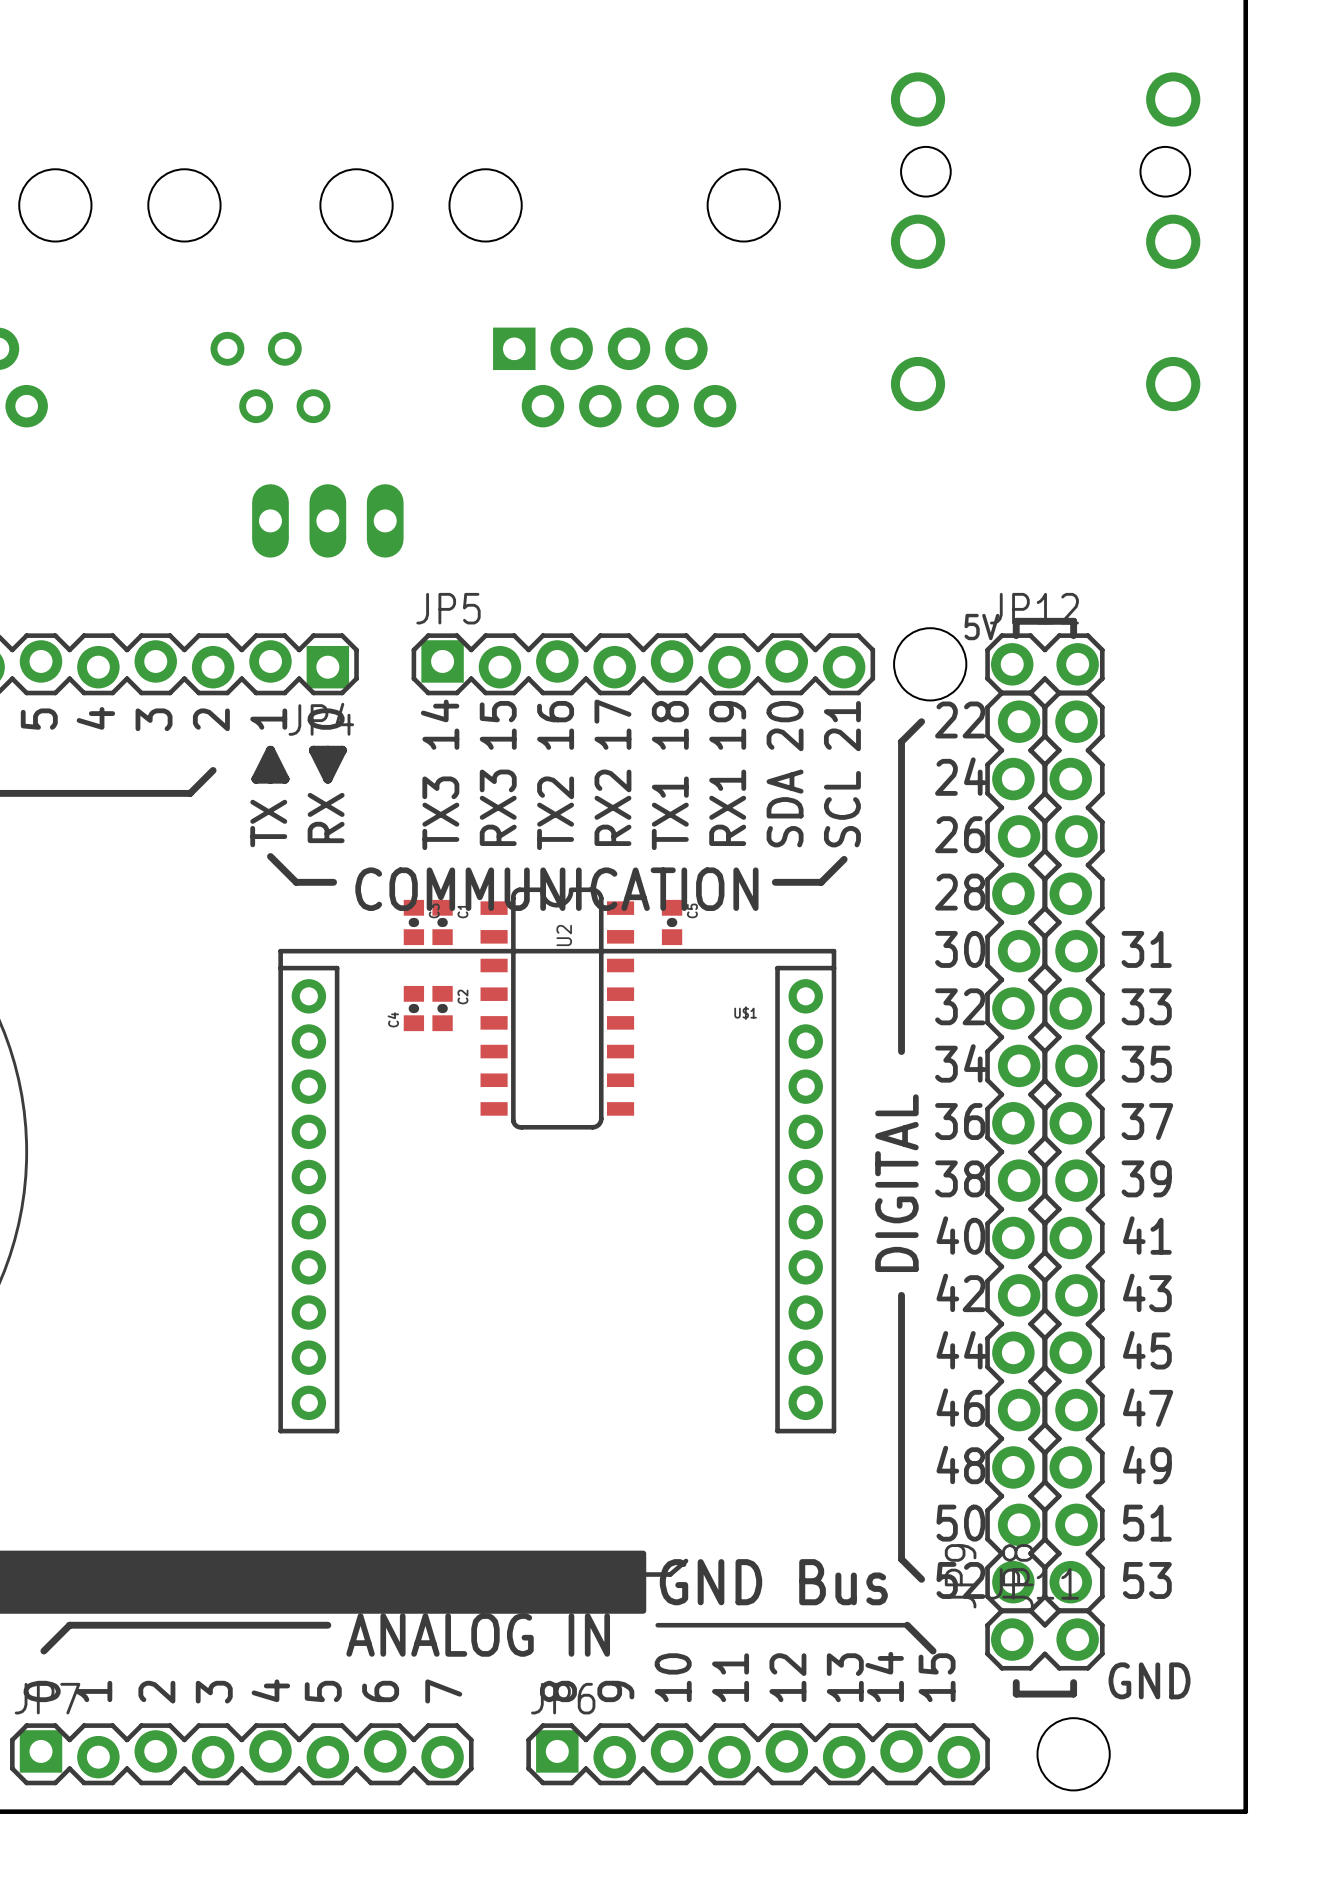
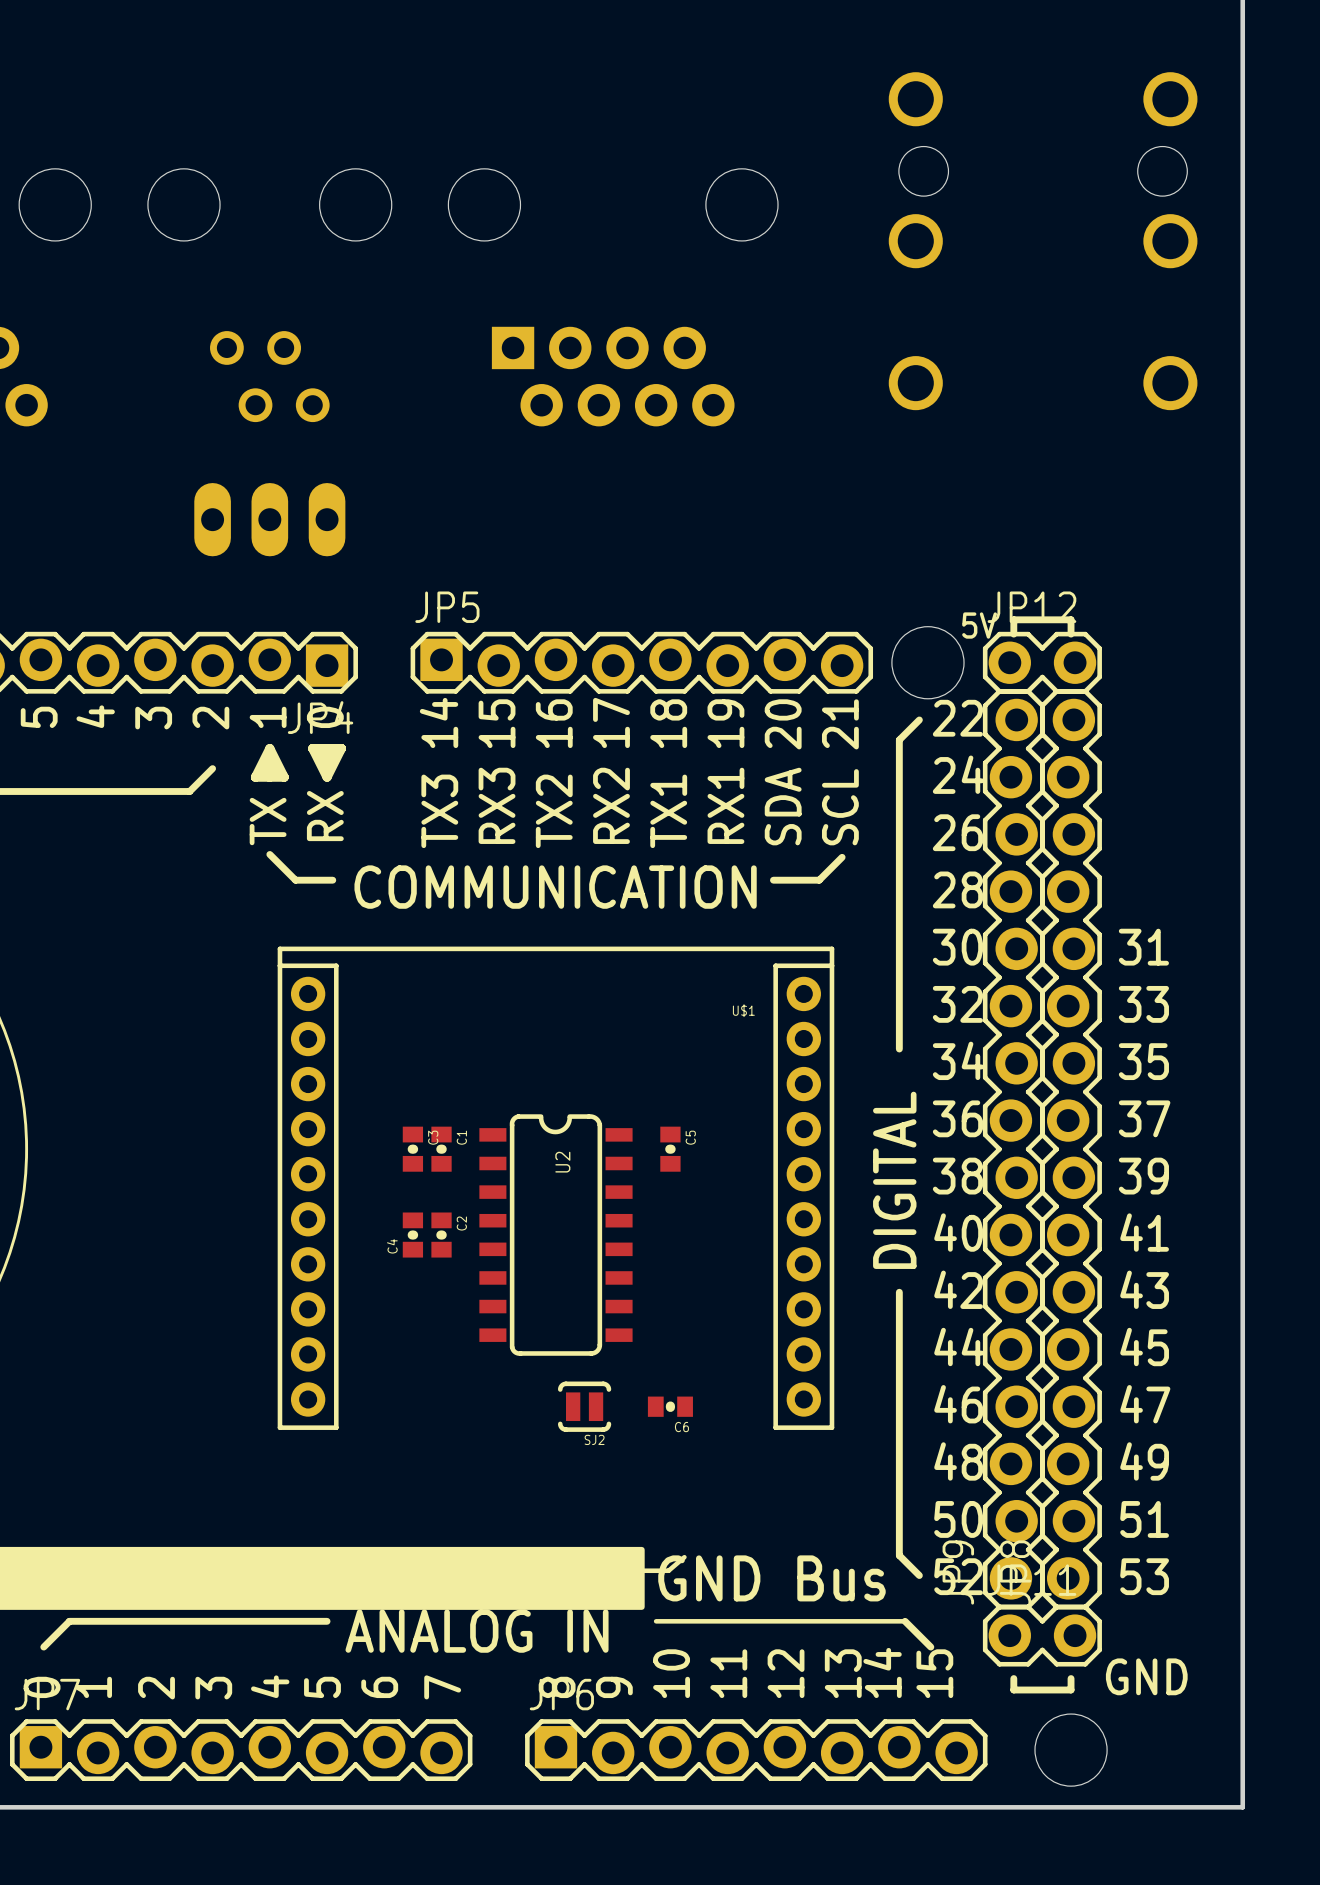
part position: (327, 520) -> (269, 519)
C3 position: (413, 922) -> (412, 1149)
C1 position: (442, 922) -> (441, 1149)
C5 position: (672, 922) -> (670, 1149)
C4 position: (413, 1008) -> (412, 1235)
C2 position: (442, 1008) -> (441, 1235)
U2 position: (557, 1008) -> (555, 1235)
SJ2: none -> (584, 1406)
C6: none -> (670, 1406)

